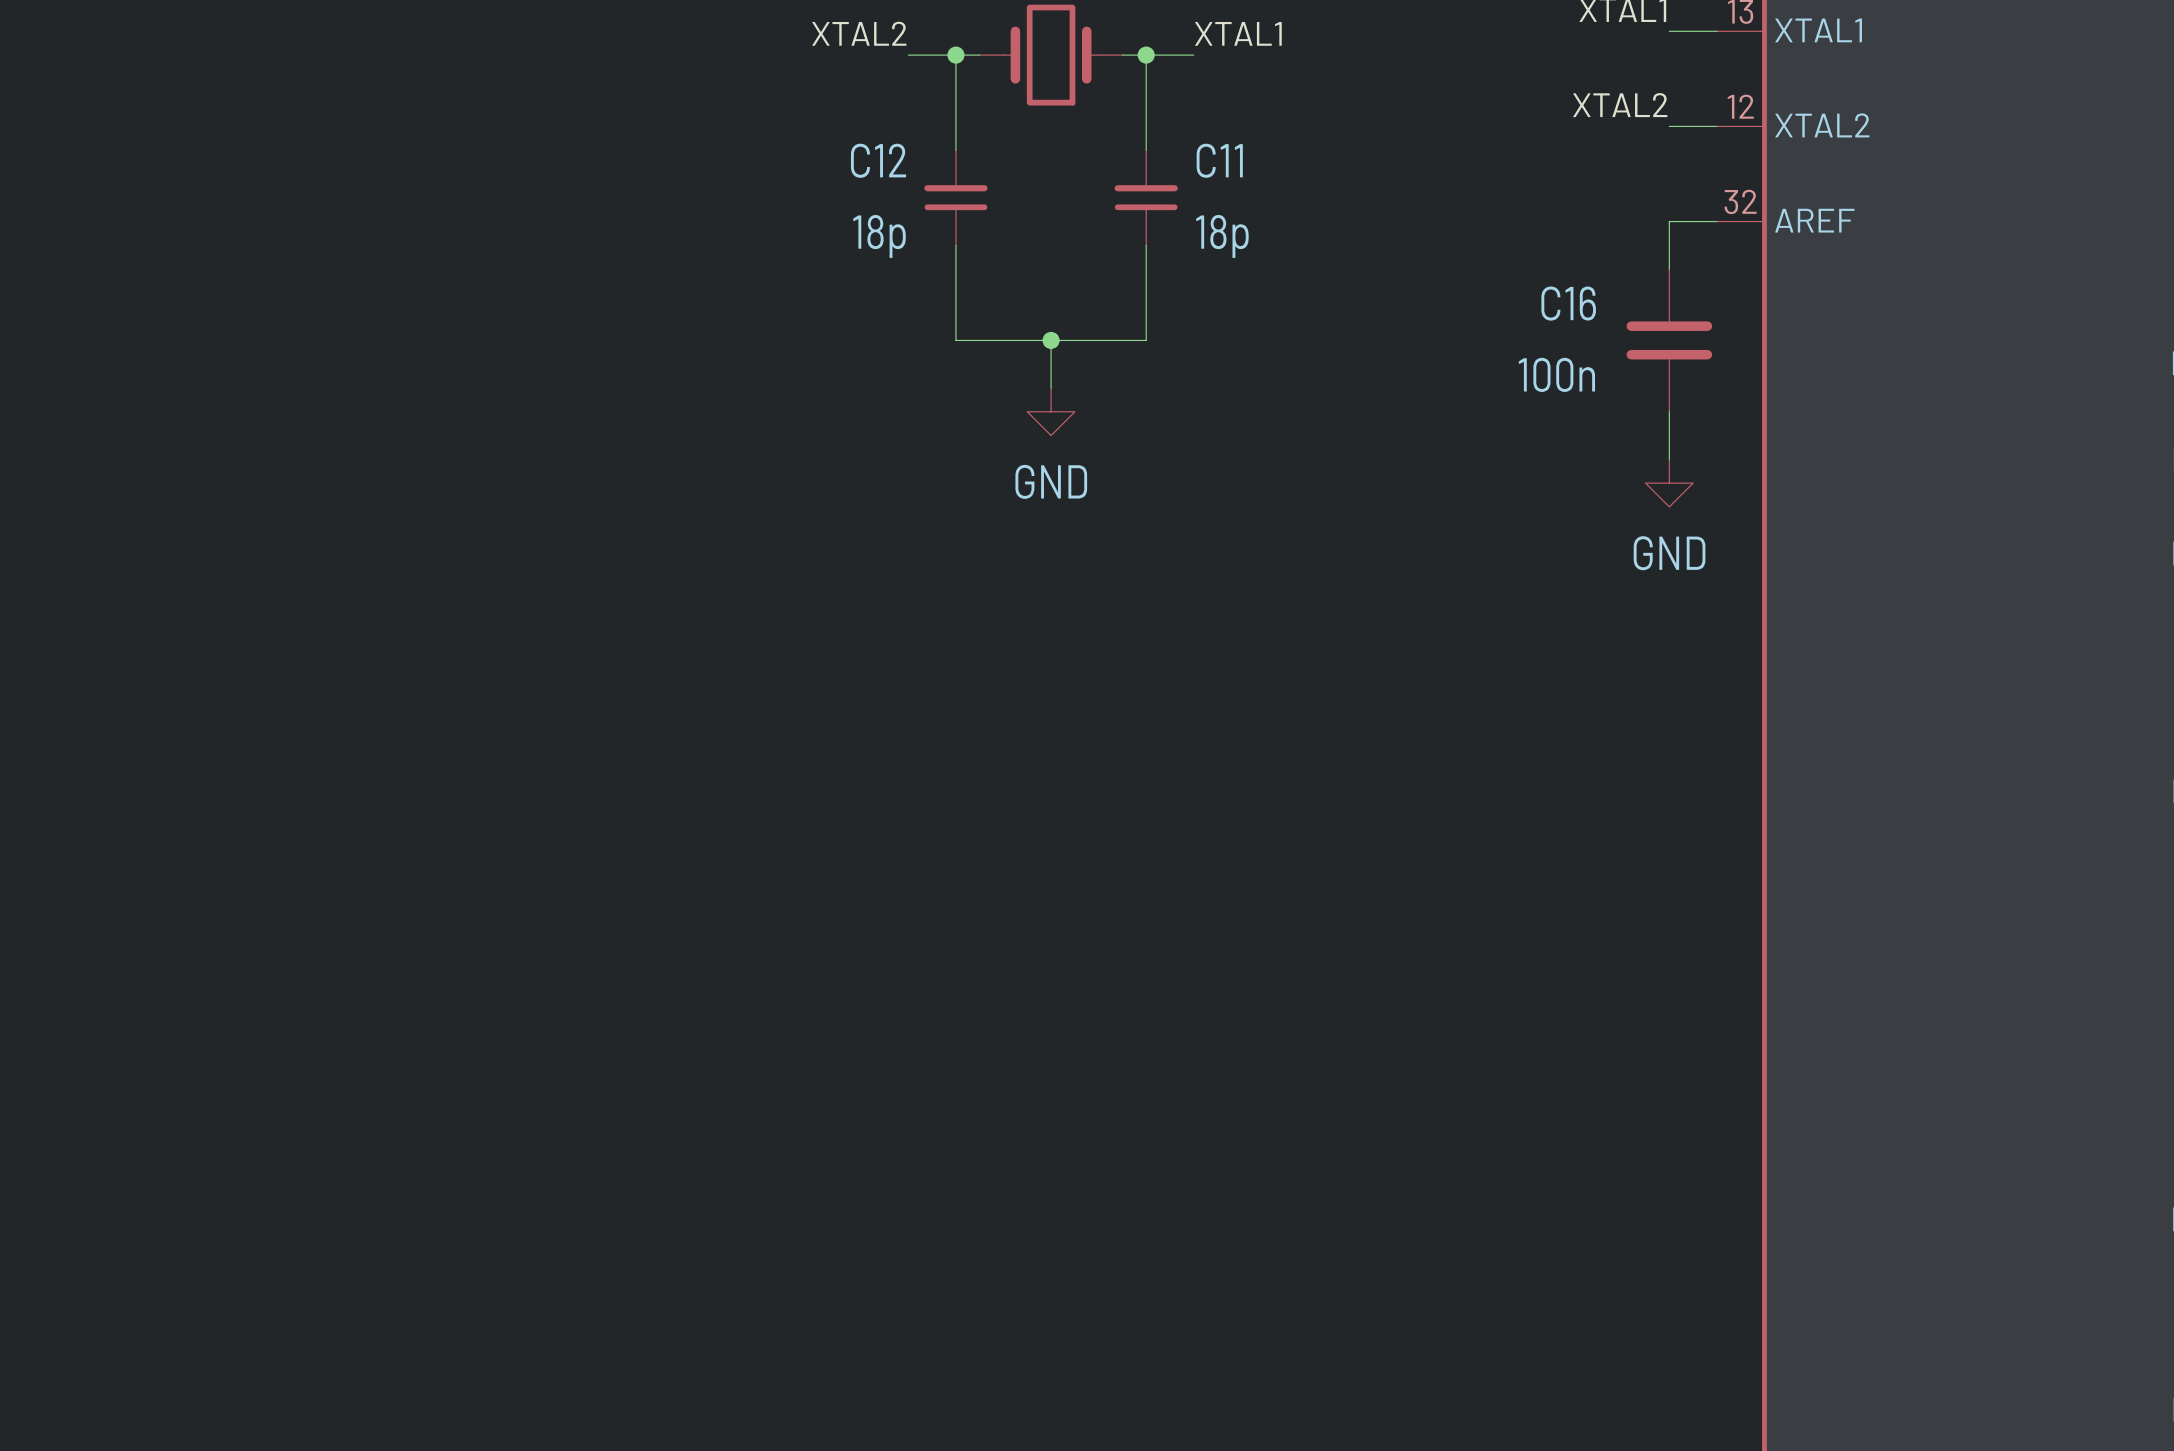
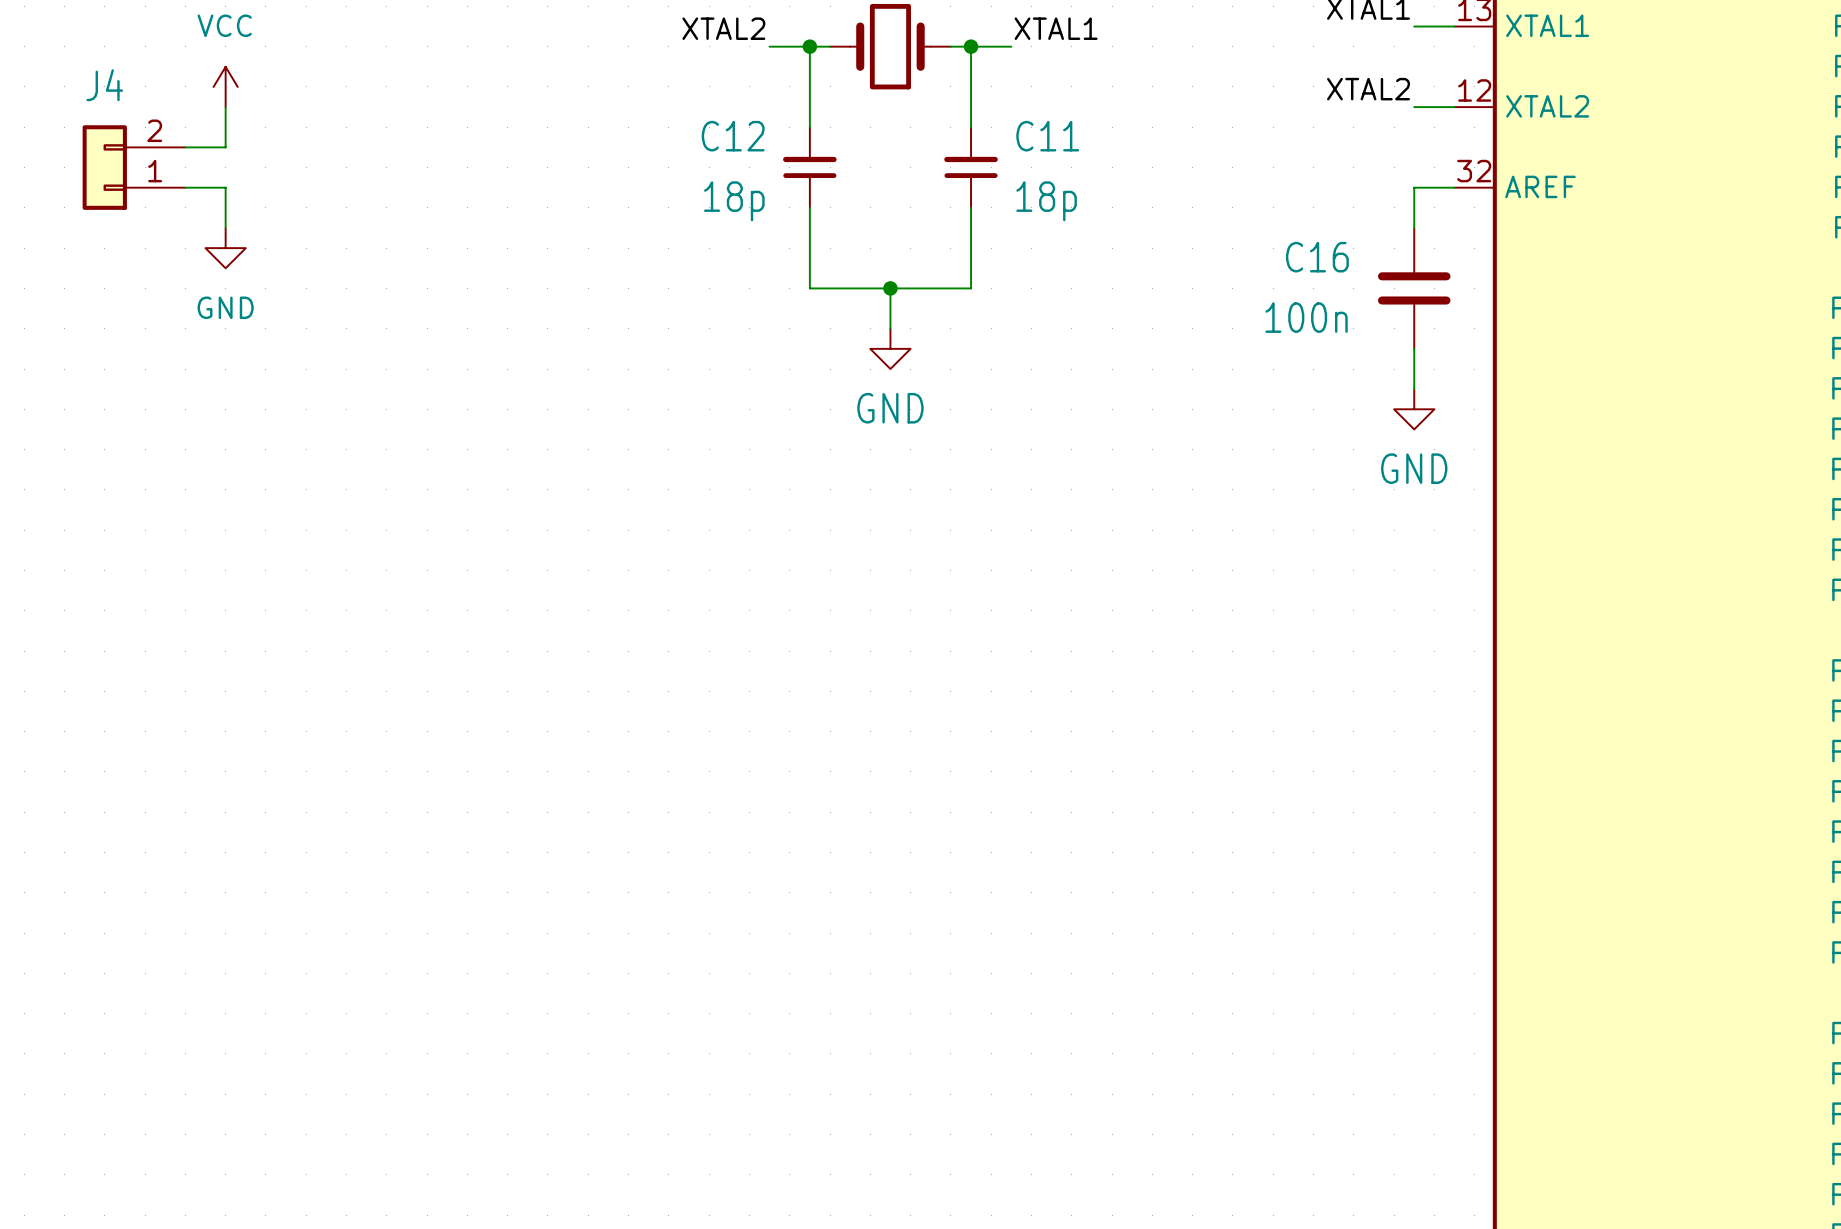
power symbol: none -> VCC (225, 86)
wire: none -> (225, 107) (225, 147) (185, 147)
J4: none -> (133, 167)
wire: none -> (185, 187) (225, 187) (225, 227)
power symbol: none -> GND (225, 248)

